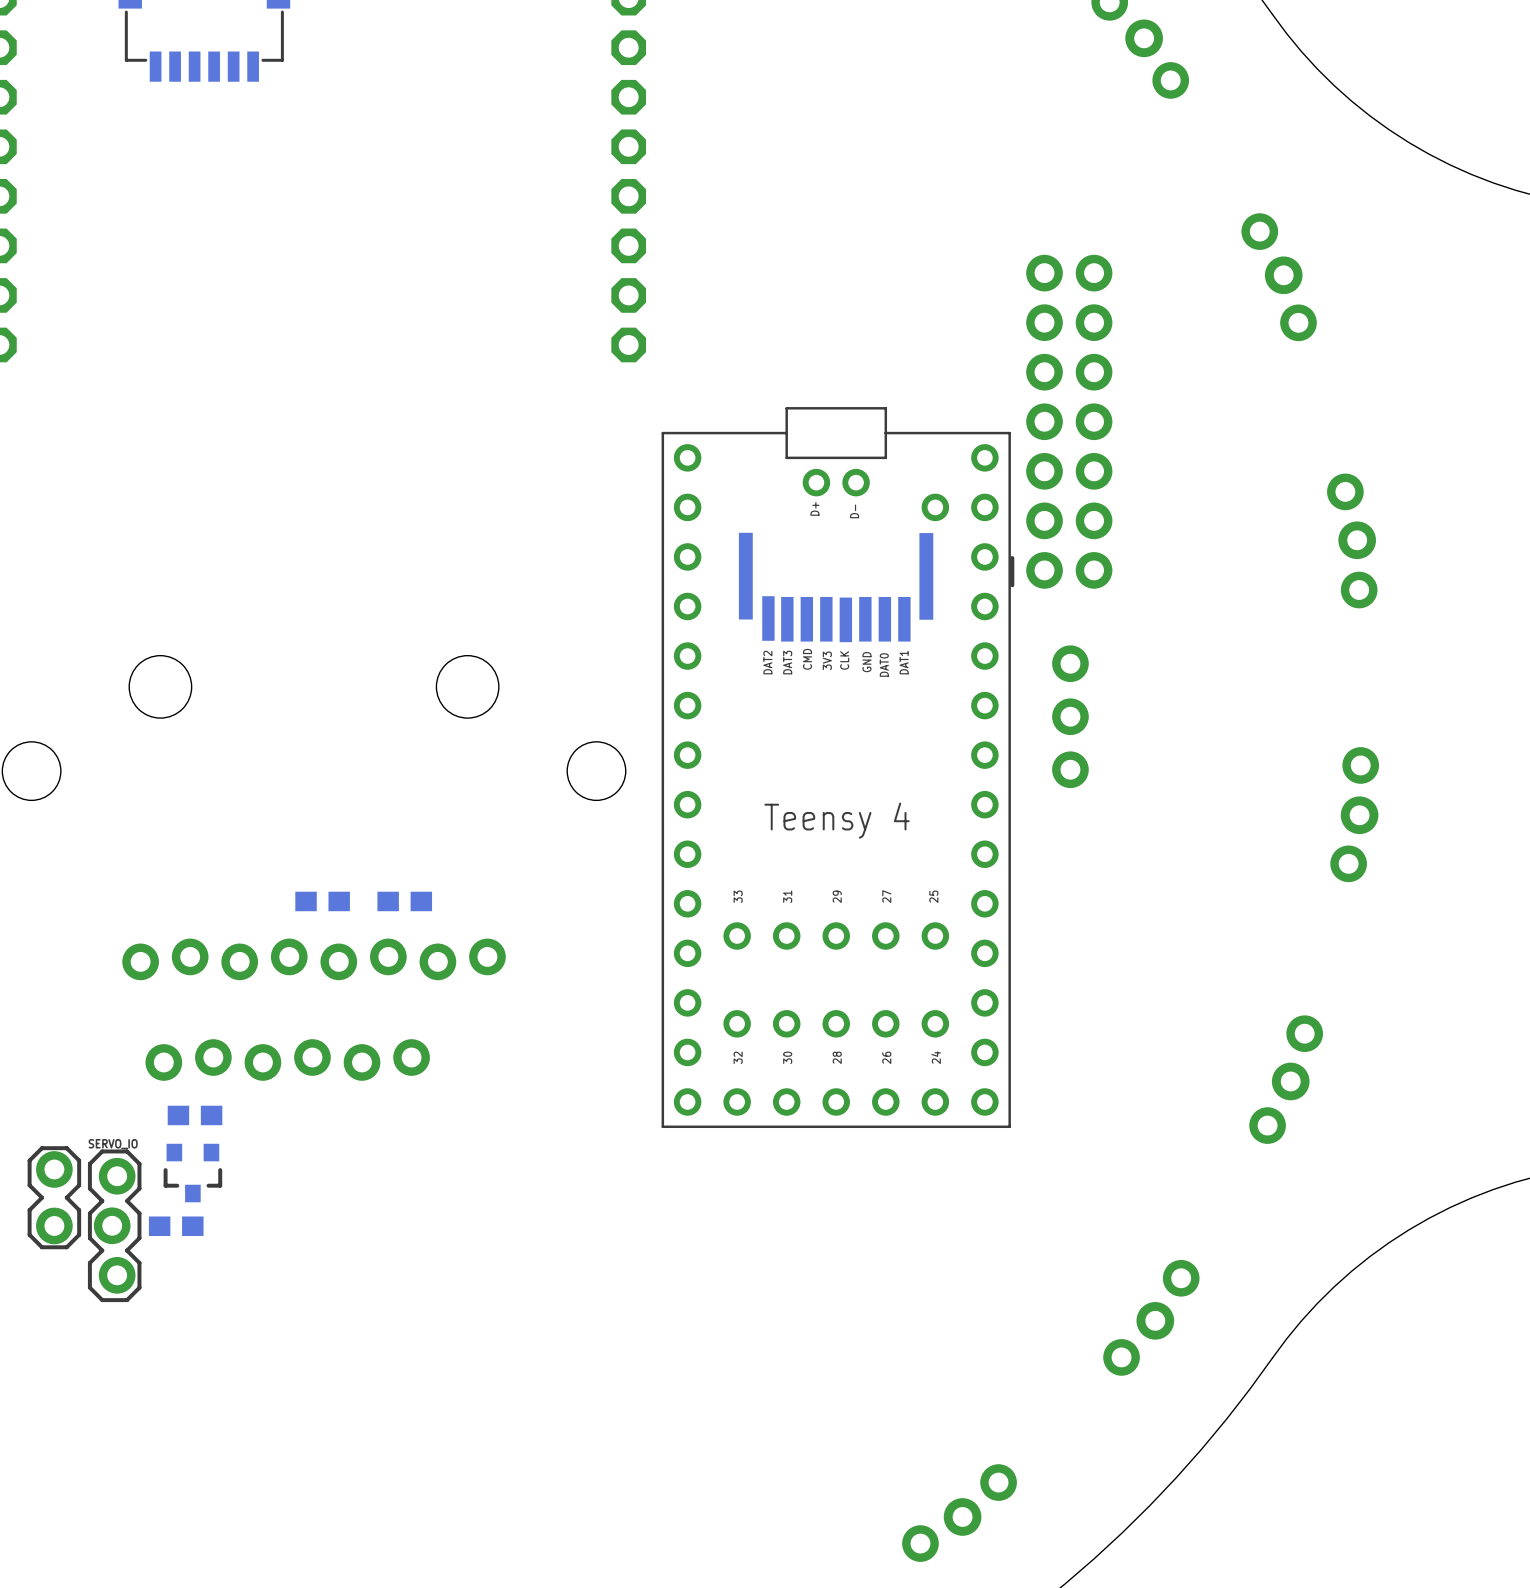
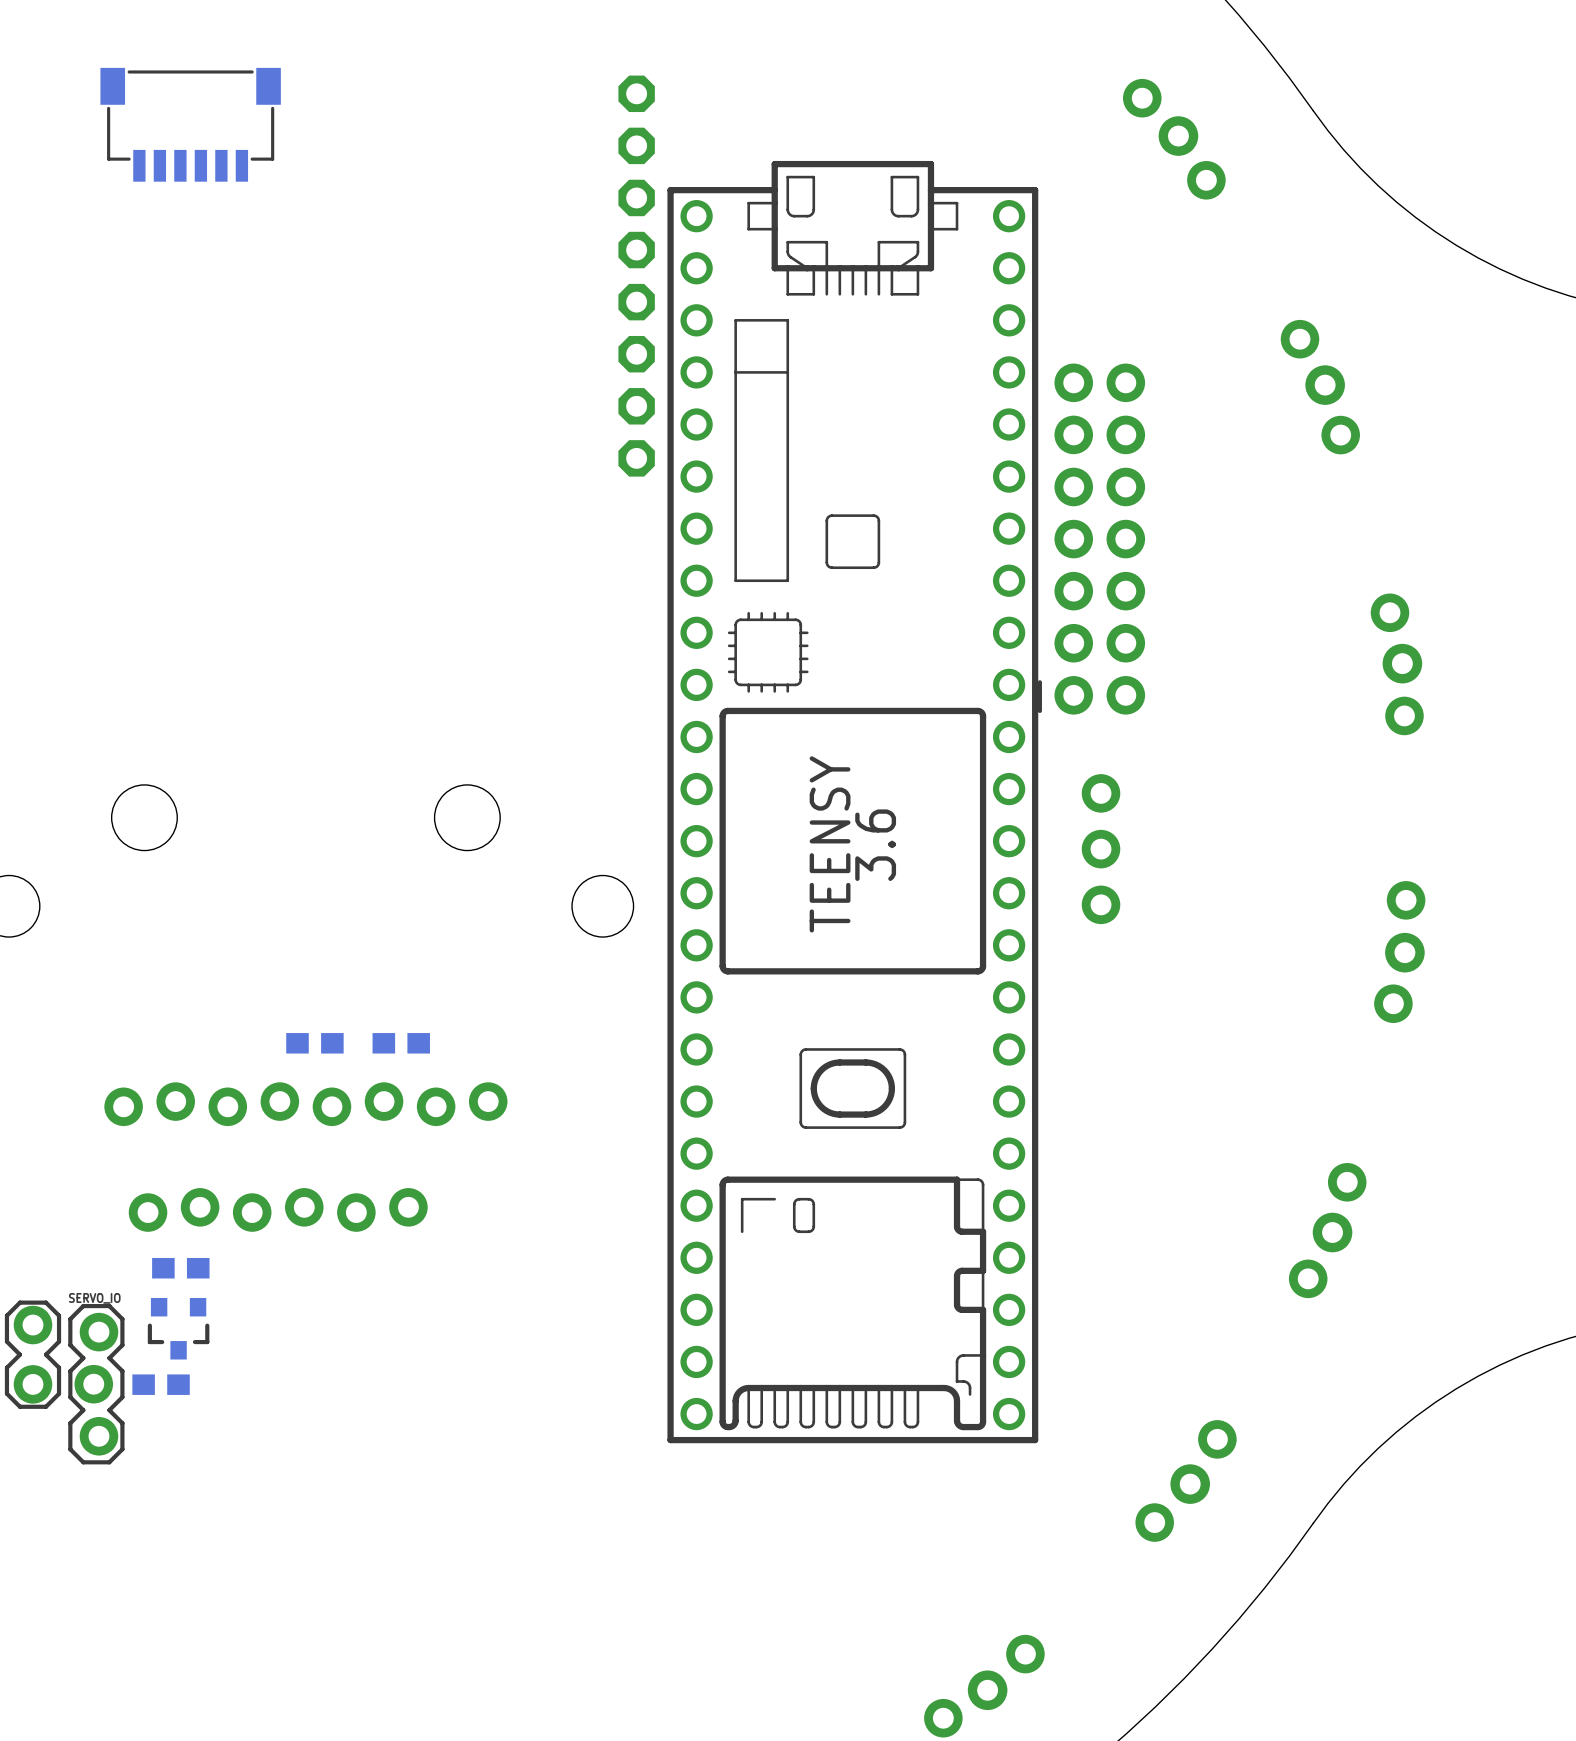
part: none -> (852, 802)
part: (836, 767) -> none

